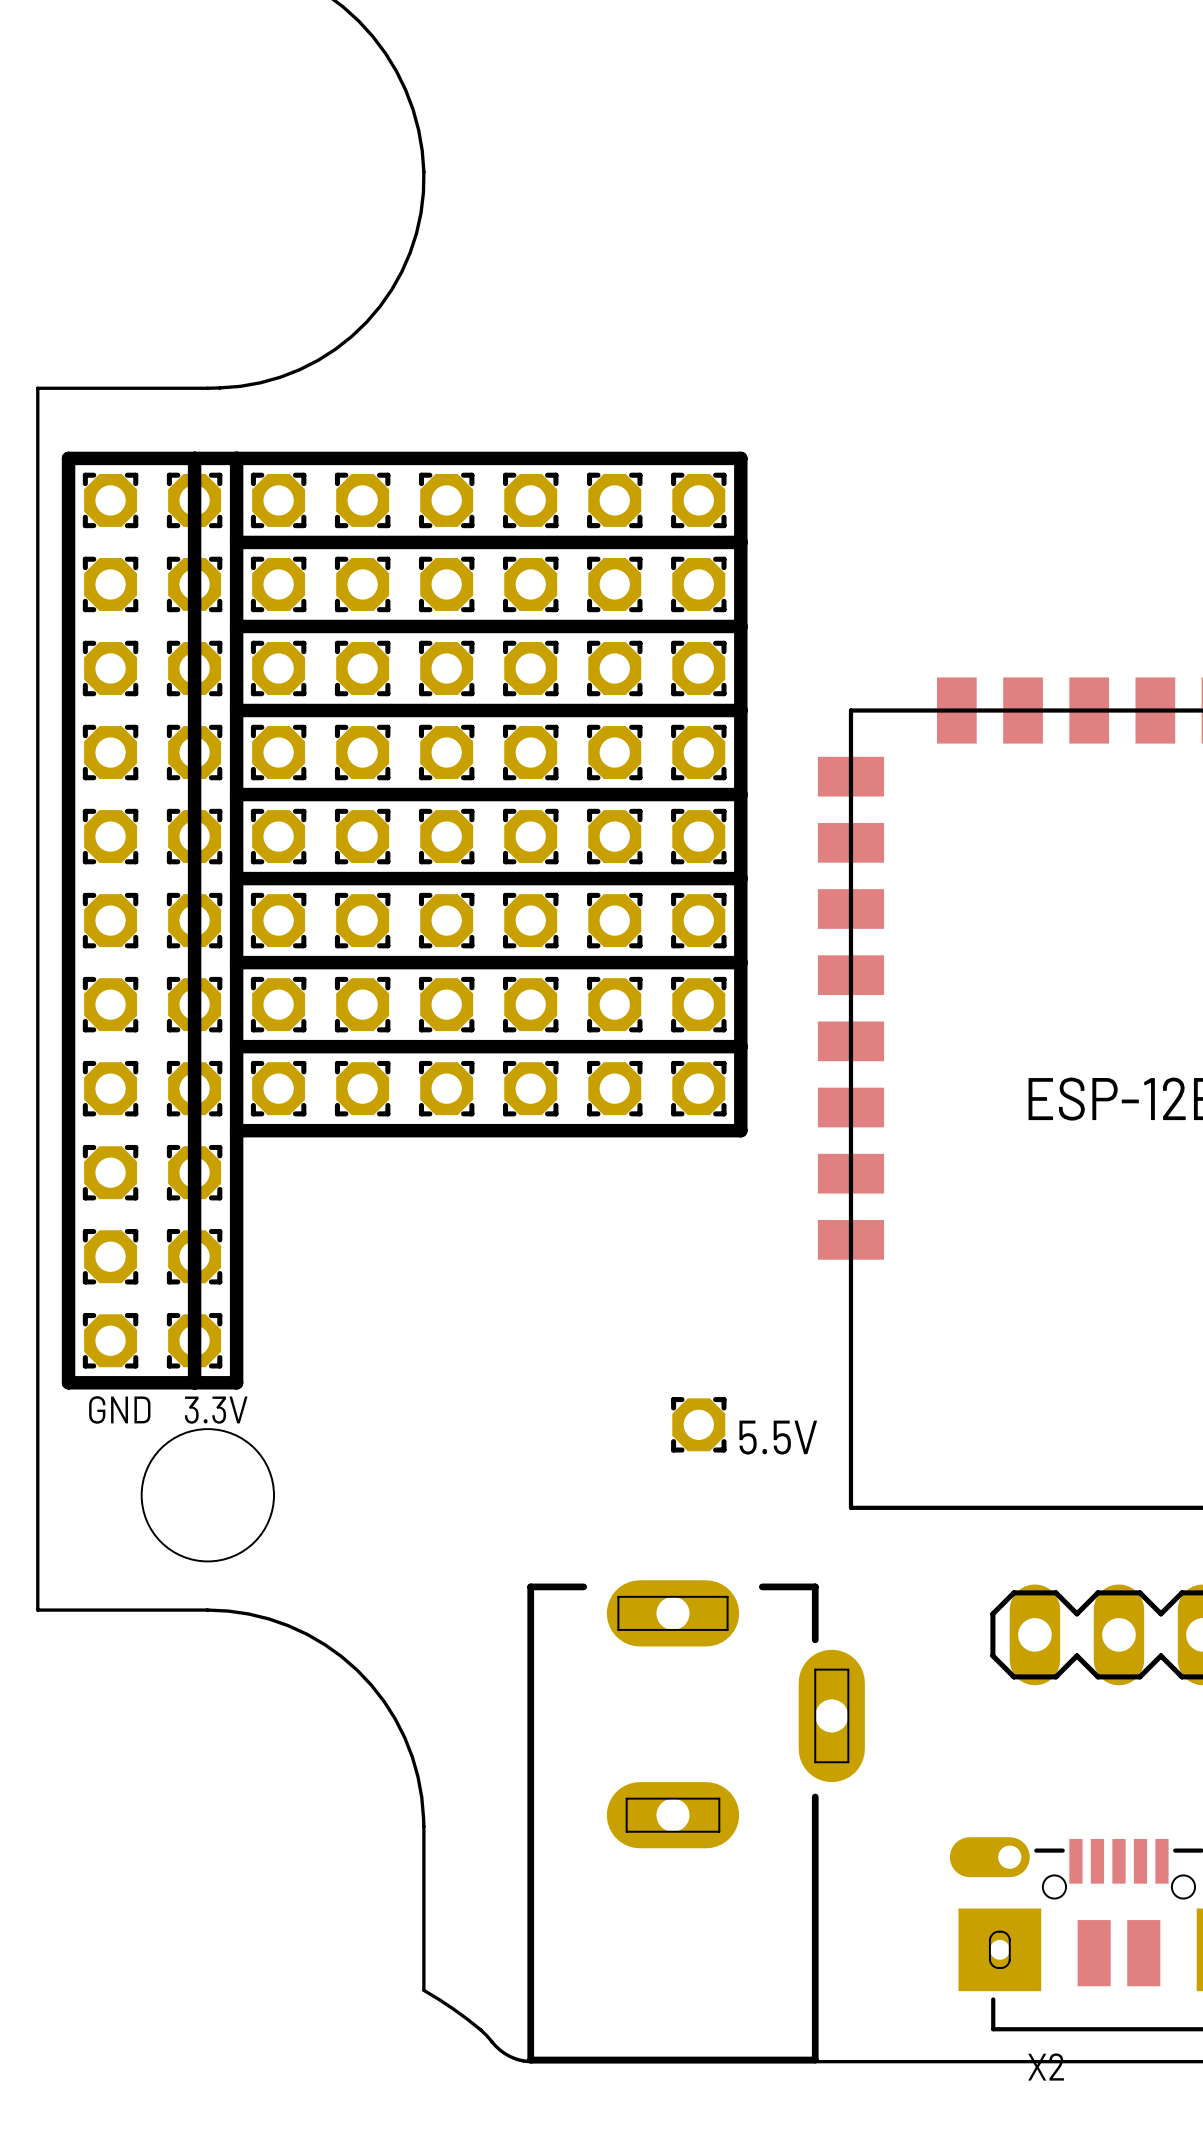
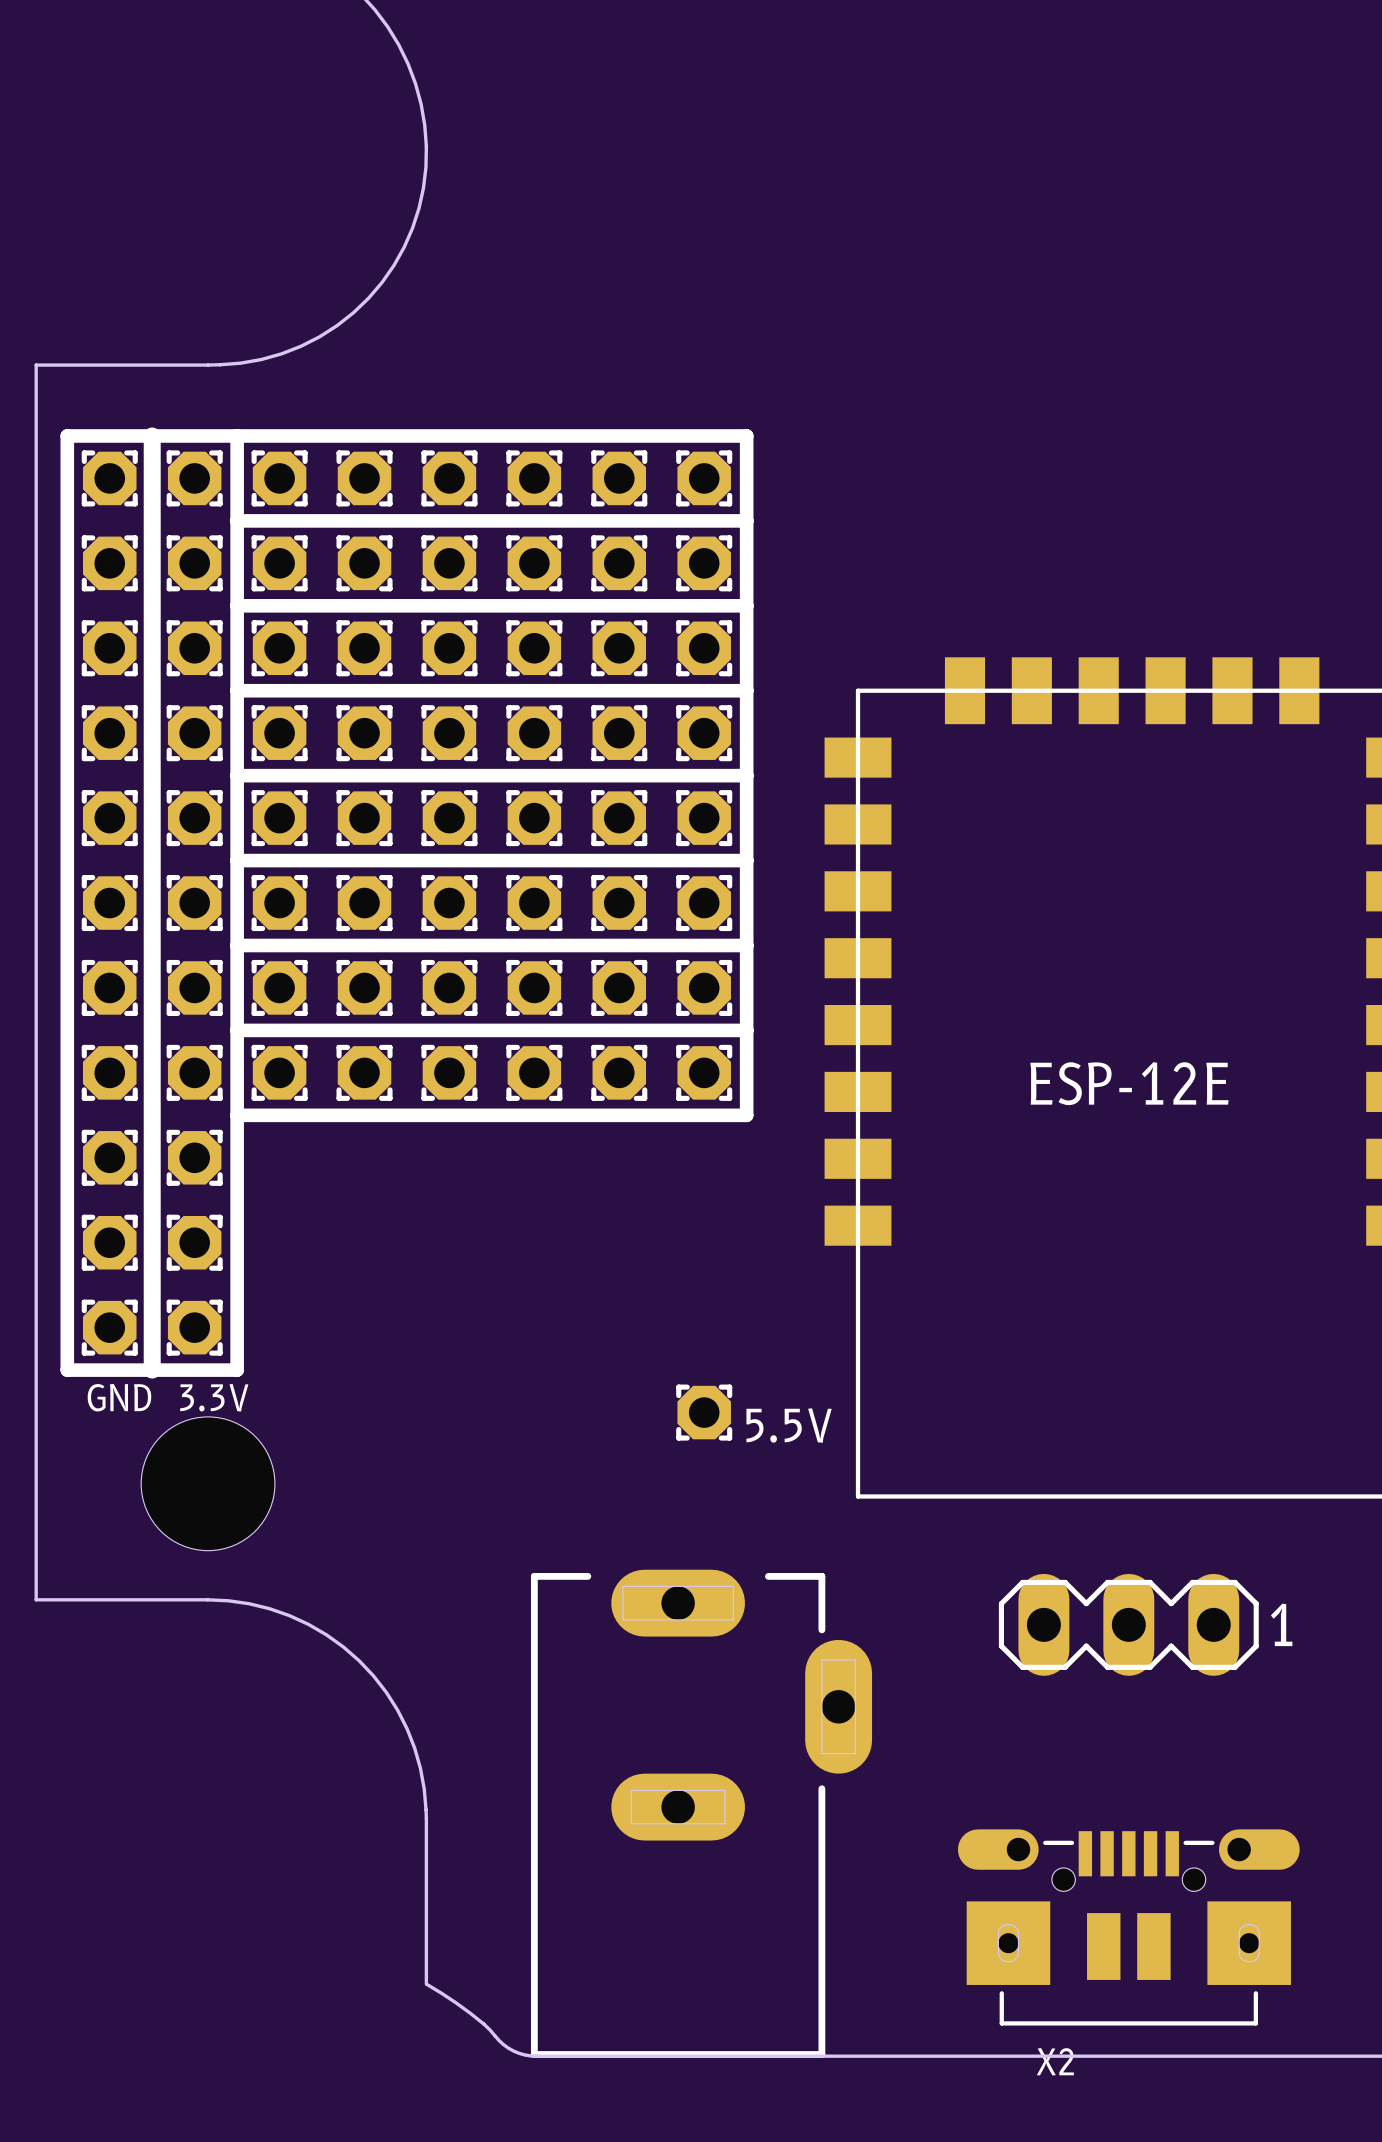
line: (194, 458) (194, 1382) -> (152, 435) (152, 1370)

